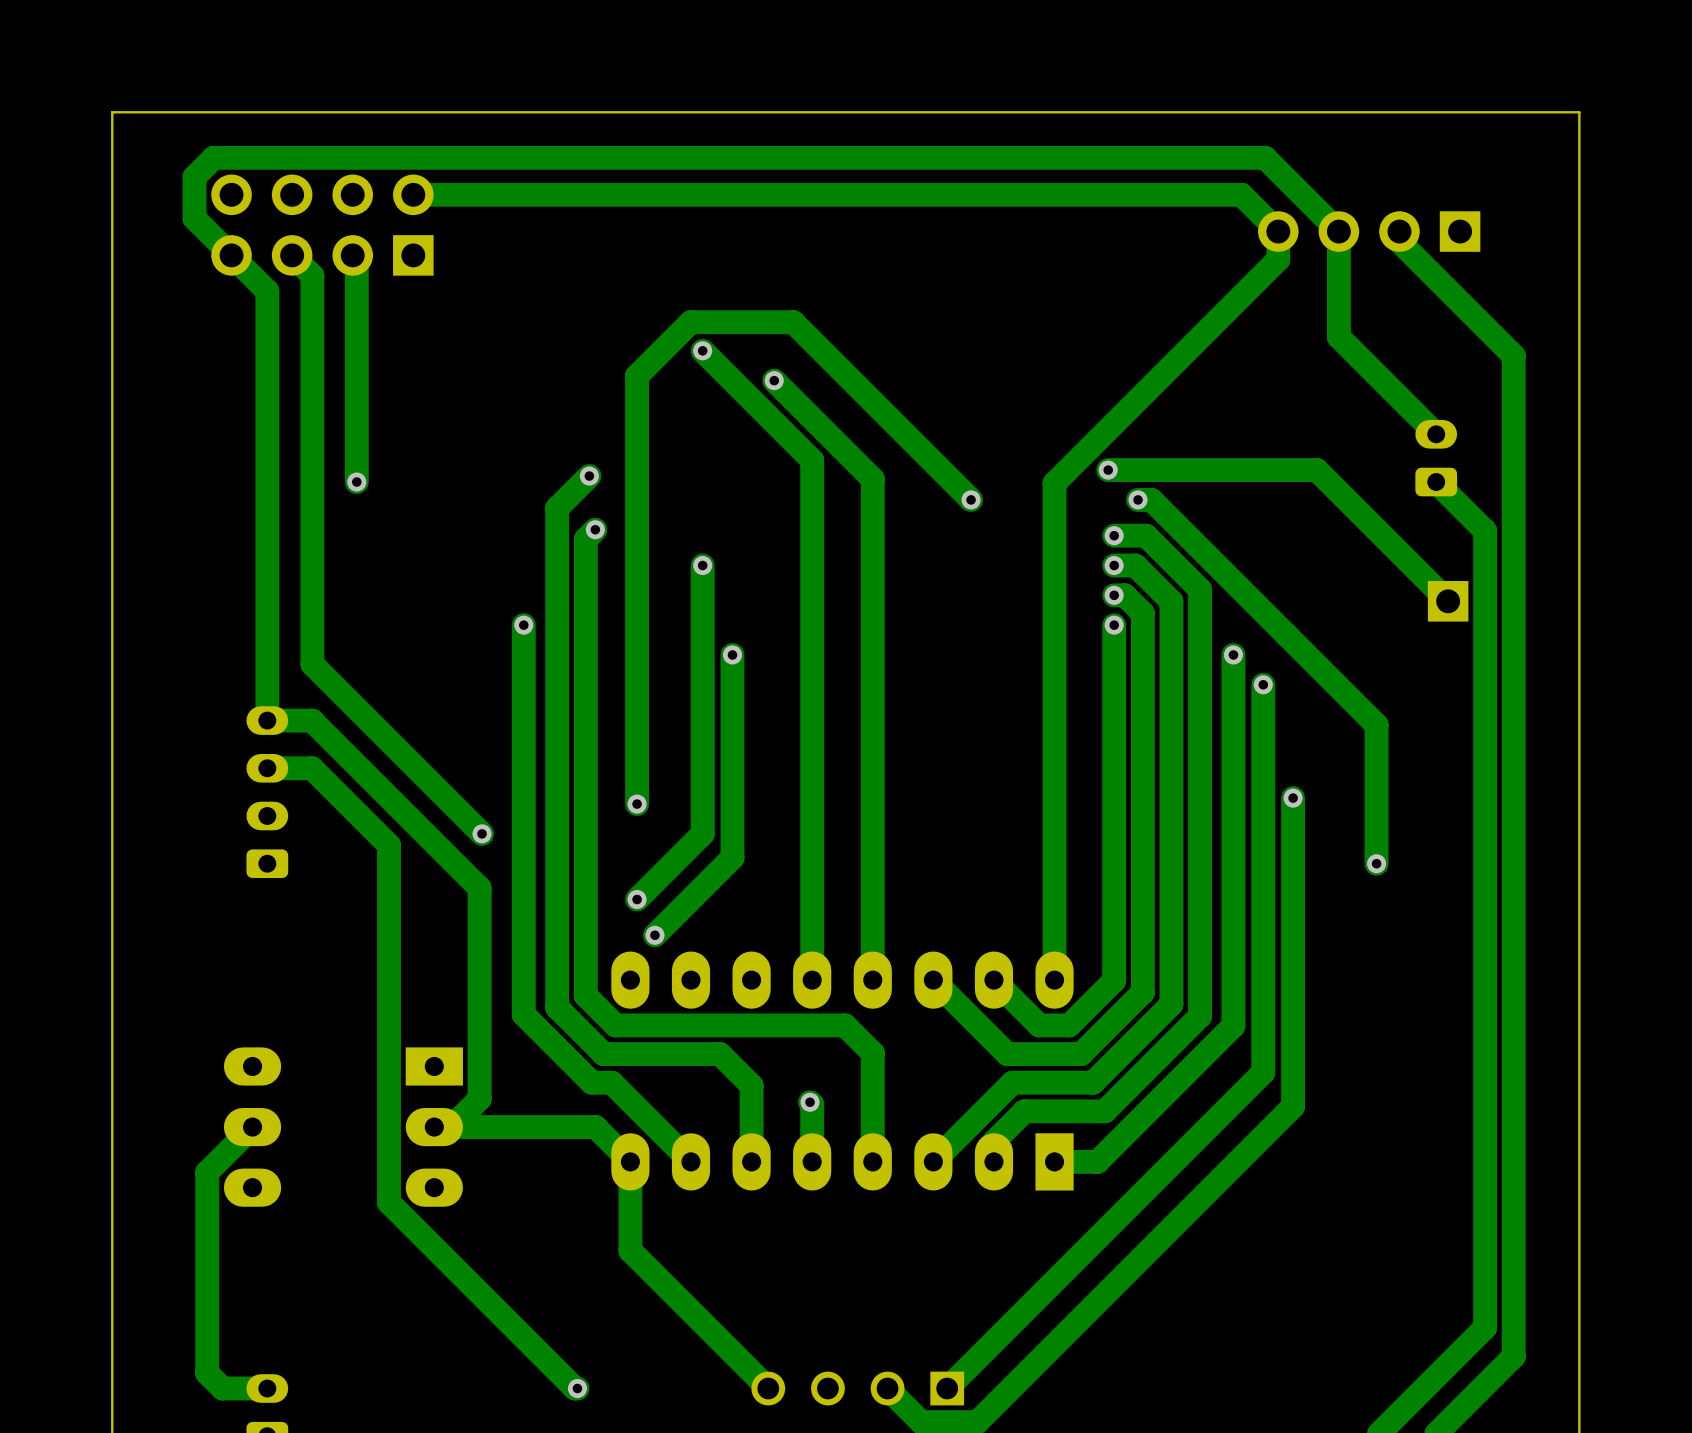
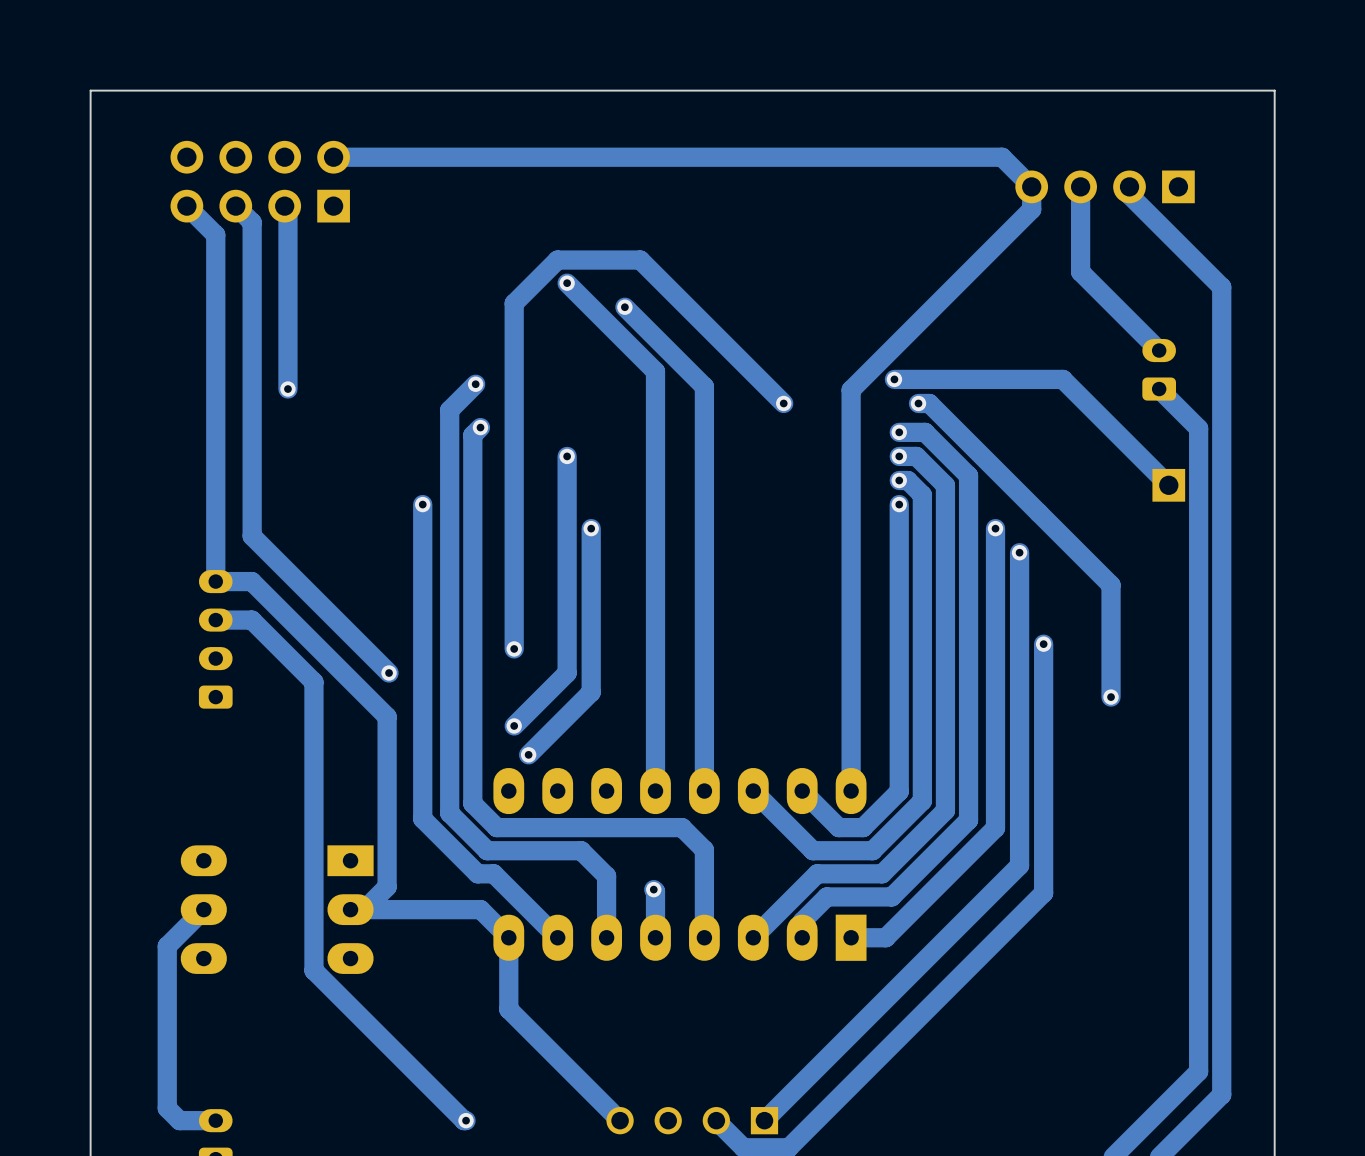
track: (1338, 231) (1265, 157) (213, 157) (194, 177) (194, 218) (231, 255) -> none

